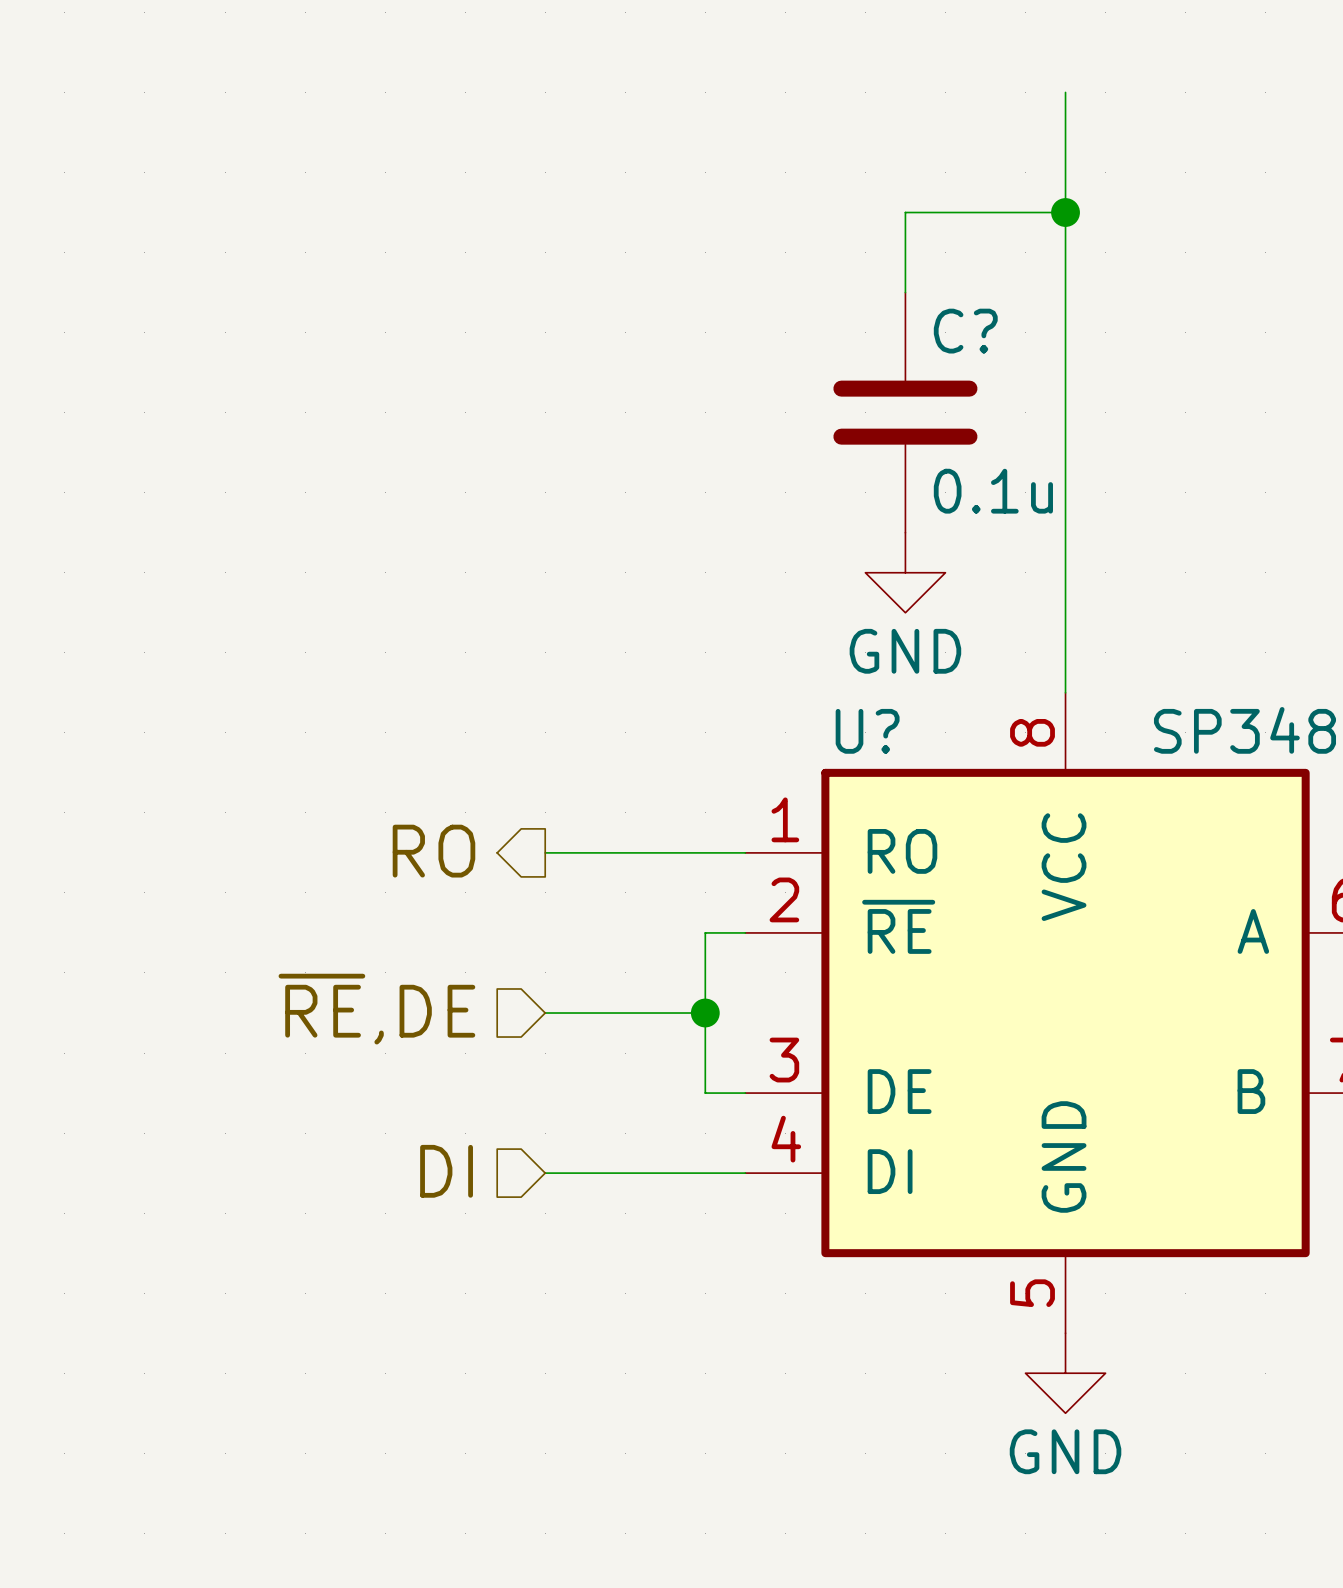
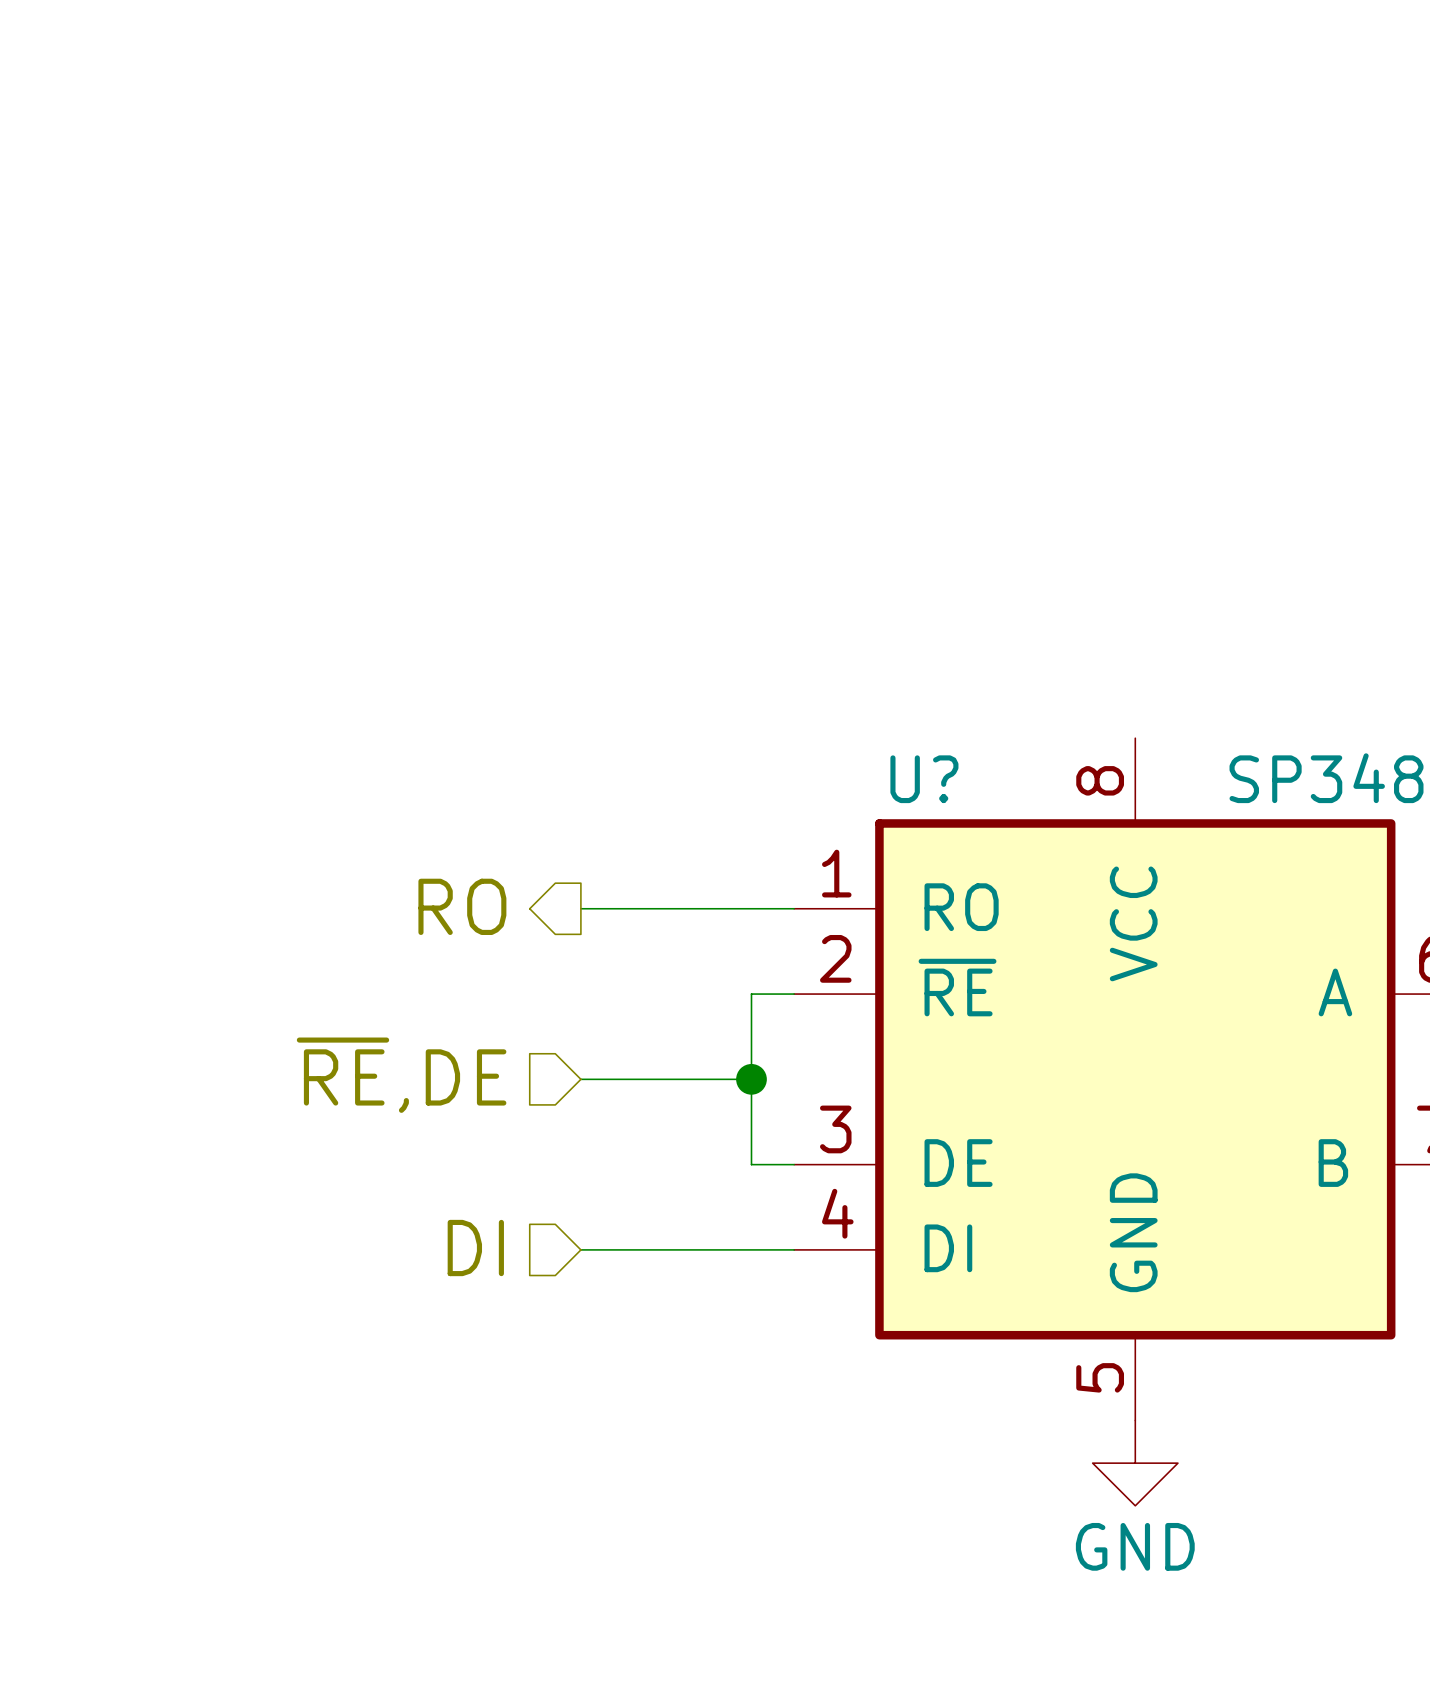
wire: (1065, 92) (1065, 692) -> none
wire: (1065, 212) (905, 212) (905, 292) -> none
junction: (1065, 212) -> none
C?: 0.1u (905, 412) -> none
power symbol: GND (905, 572) -> none

